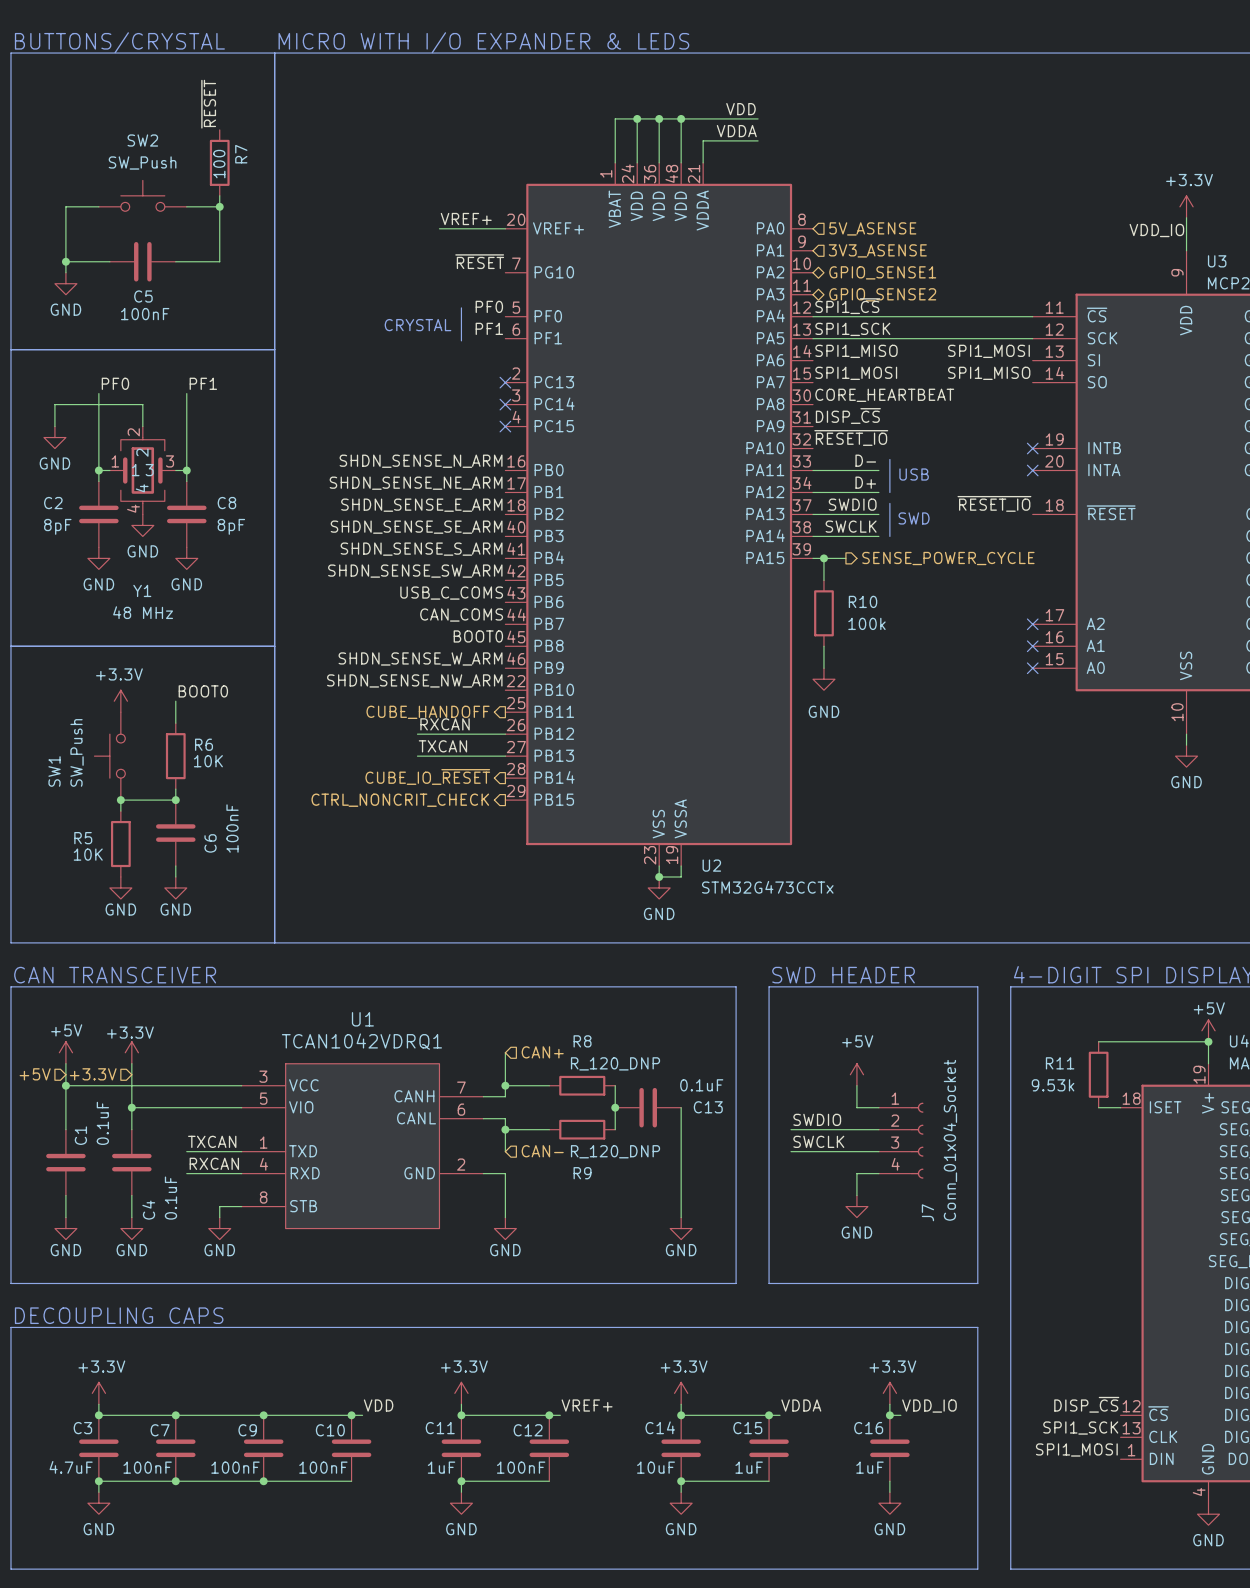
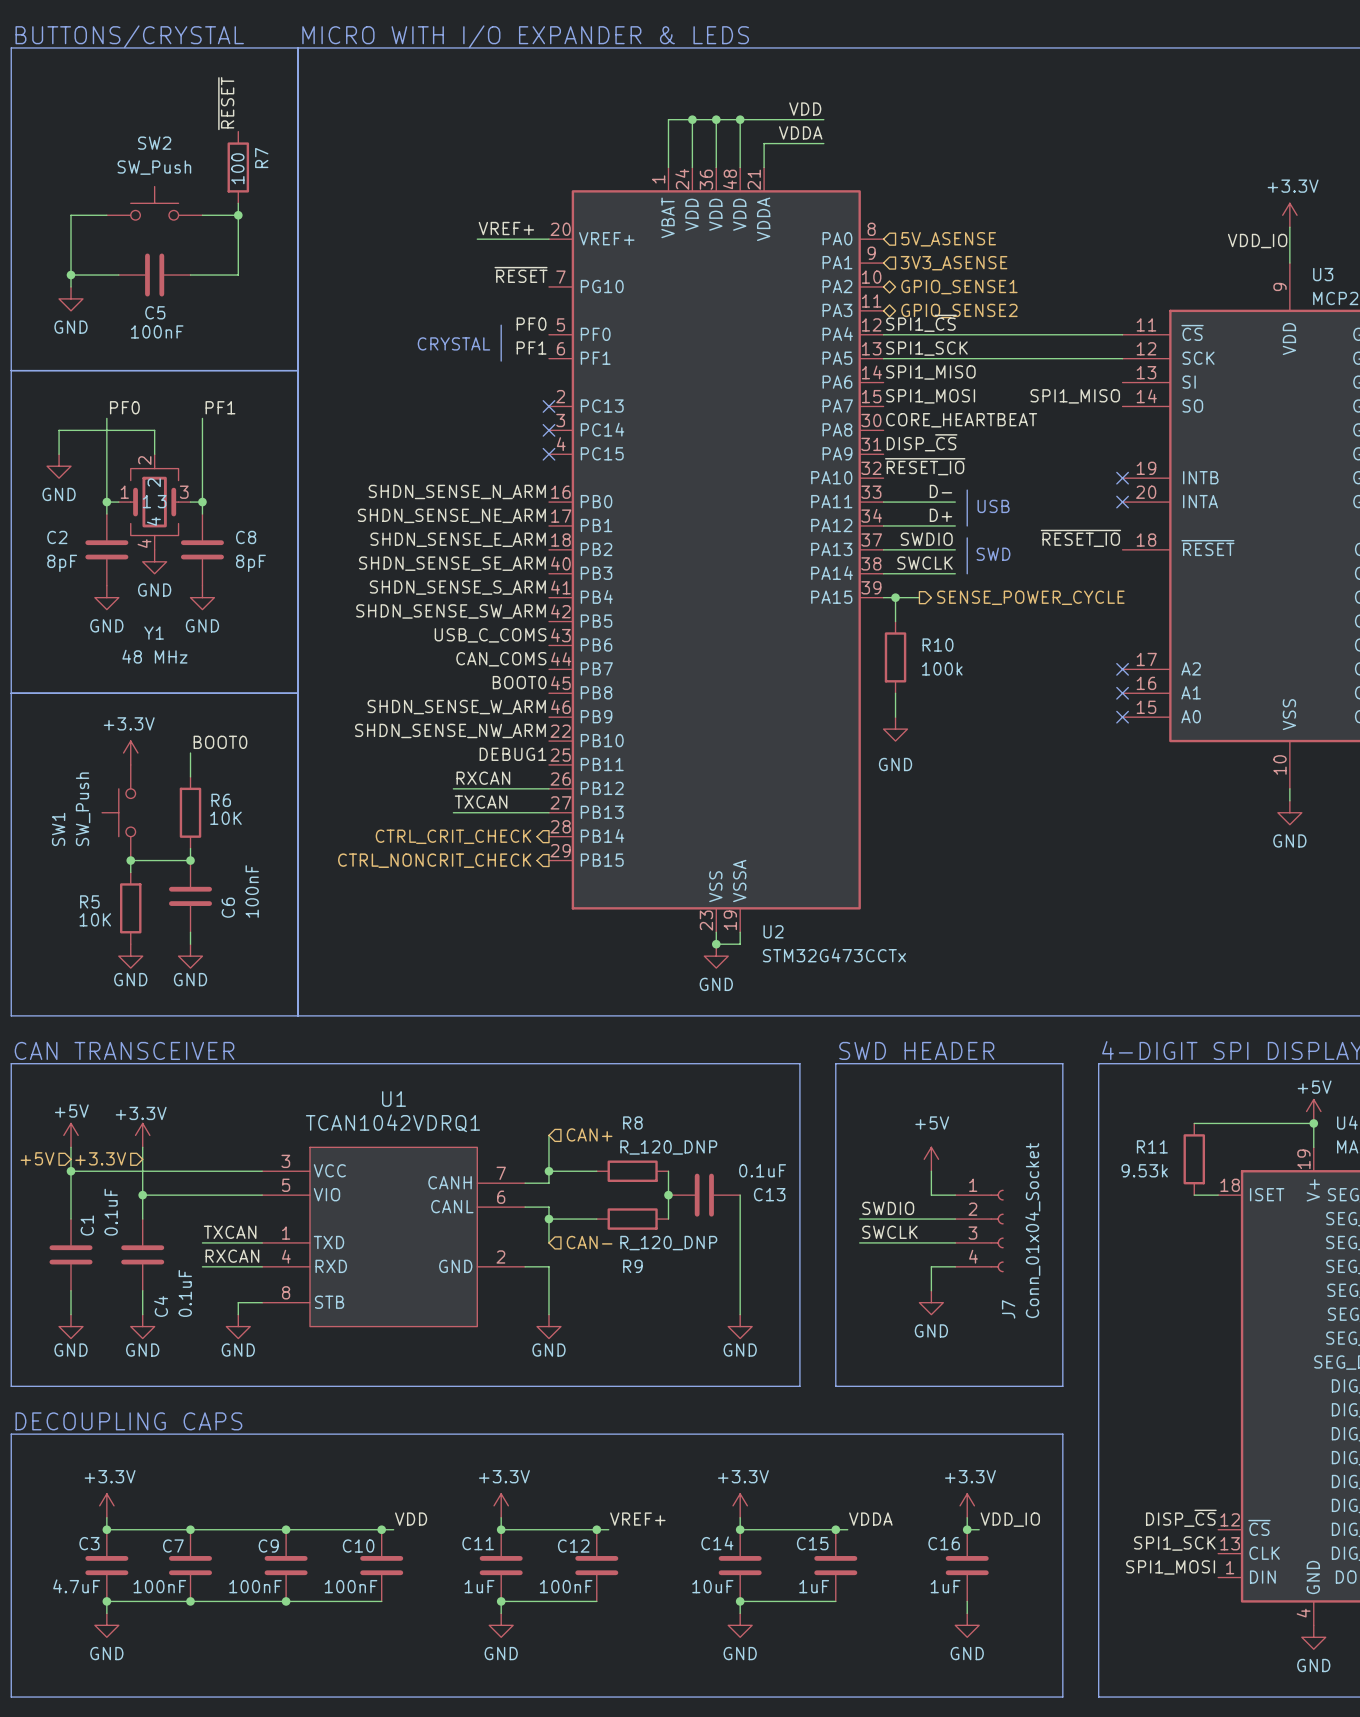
label: SPI1_MOSI (988, 351) -> none
label: none -> DEBUG1 (513, 754)
hierarchical label: CUBE_HANDOFF (428, 712) -> none
hierarchical label: CUBE_IO_~{RESET} (427, 776) -> CTRL_CRIT_CHECK (453, 836)

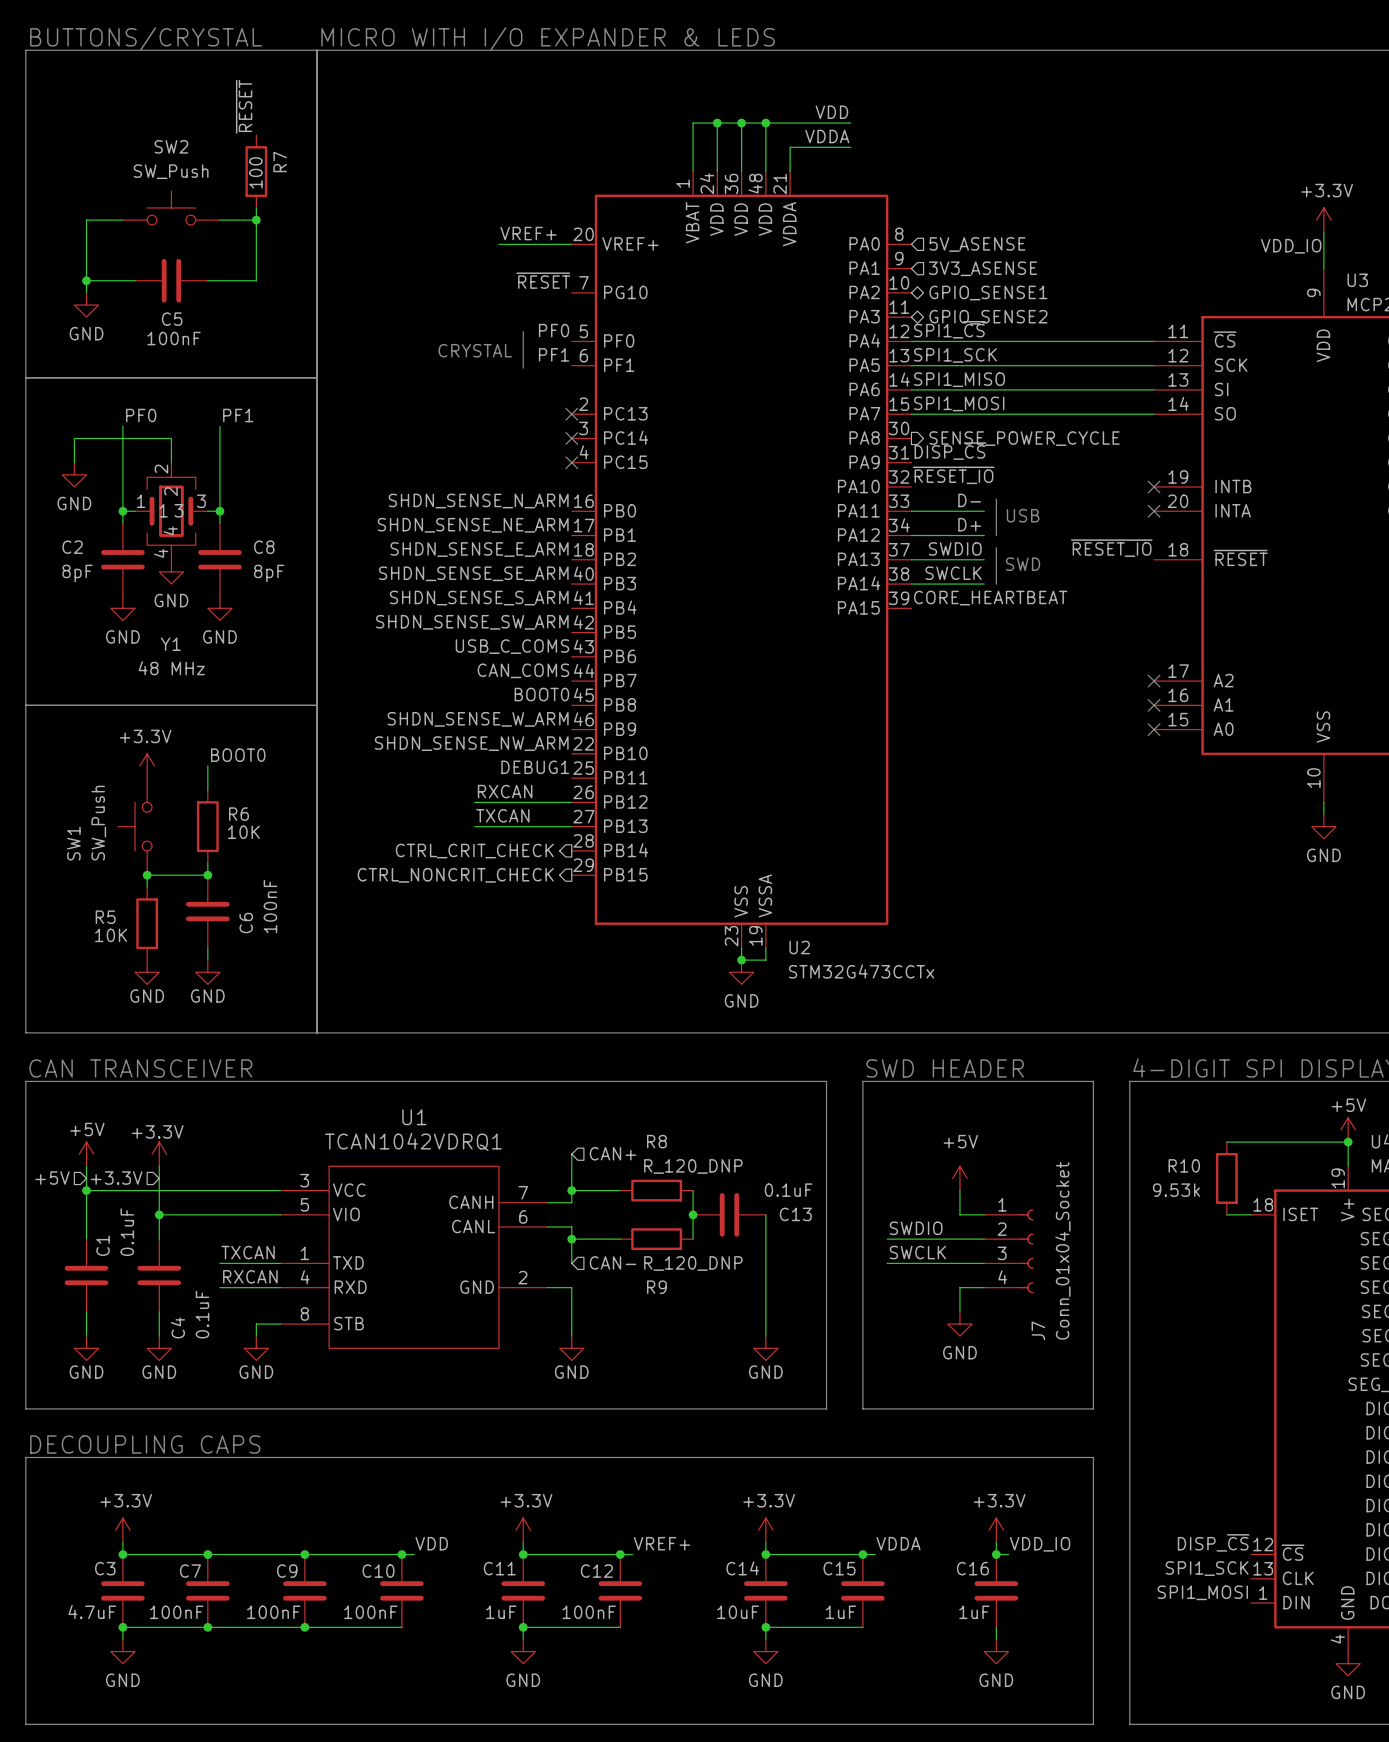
wire: none -> (911, 389) (1154, 389)
label: SPI1_MISO (1075, 396) -> none
wire: none -> (911, 414) (1154, 414)
label position: CORE_HEARTBEAT (961, 420) -> CORE_HEARTBEAT (990, 598)
wire: (883, 597) (919, 597) -> none
wire: (895, 597) (895, 621) -> none
junction: (895, 597) -> none
hierarchical label position: SENSE_POWER_CYCLE (1030, 597) -> SENSE_POWER_CYCLE (1024, 438)
R10: 100k (895, 657) -> none
wire: (895, 693) (895, 717) -> none
power symbol: GND (895, 729) -> none
R11 name: R11 (1152, 1146) -> R10 (1184, 1165)

